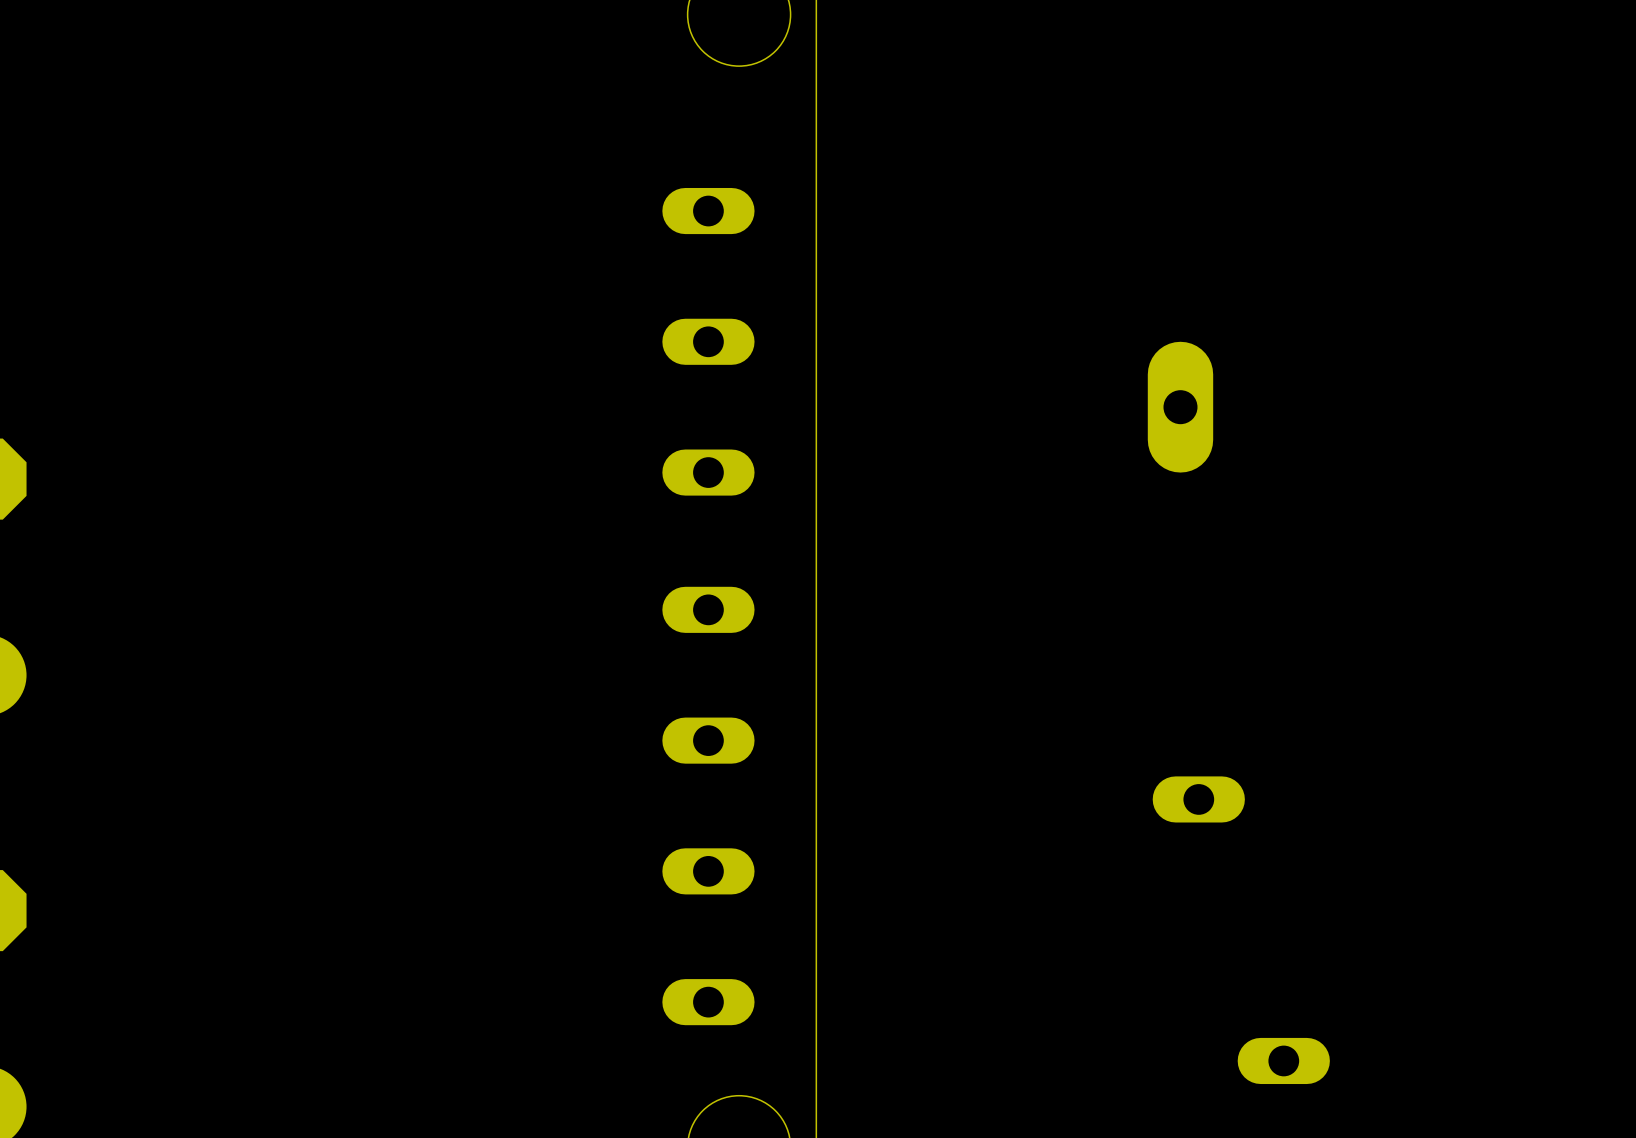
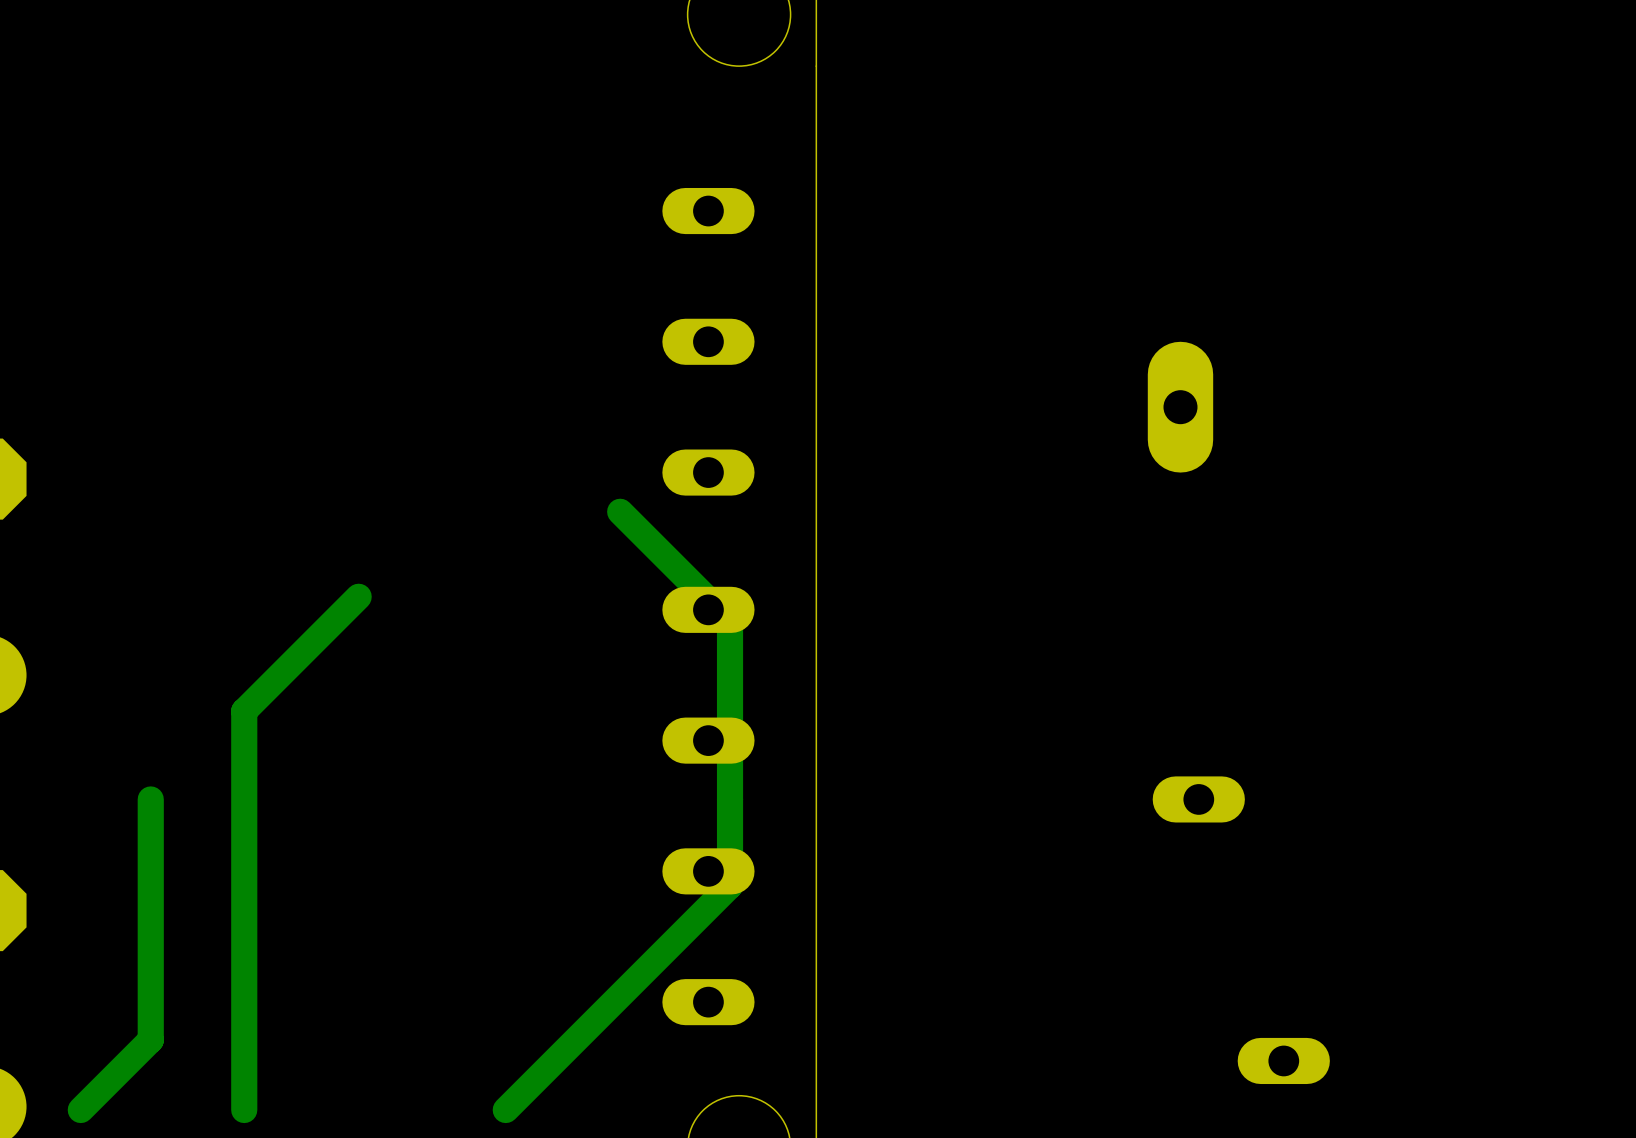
track: none -> (620, 511) (730, 621) (730, 885) (505, 1110)
track: none -> (358, 596) (244, 711) (244, 1110)
track: none -> (150, 799) (150, 1040) (80, 1110)

